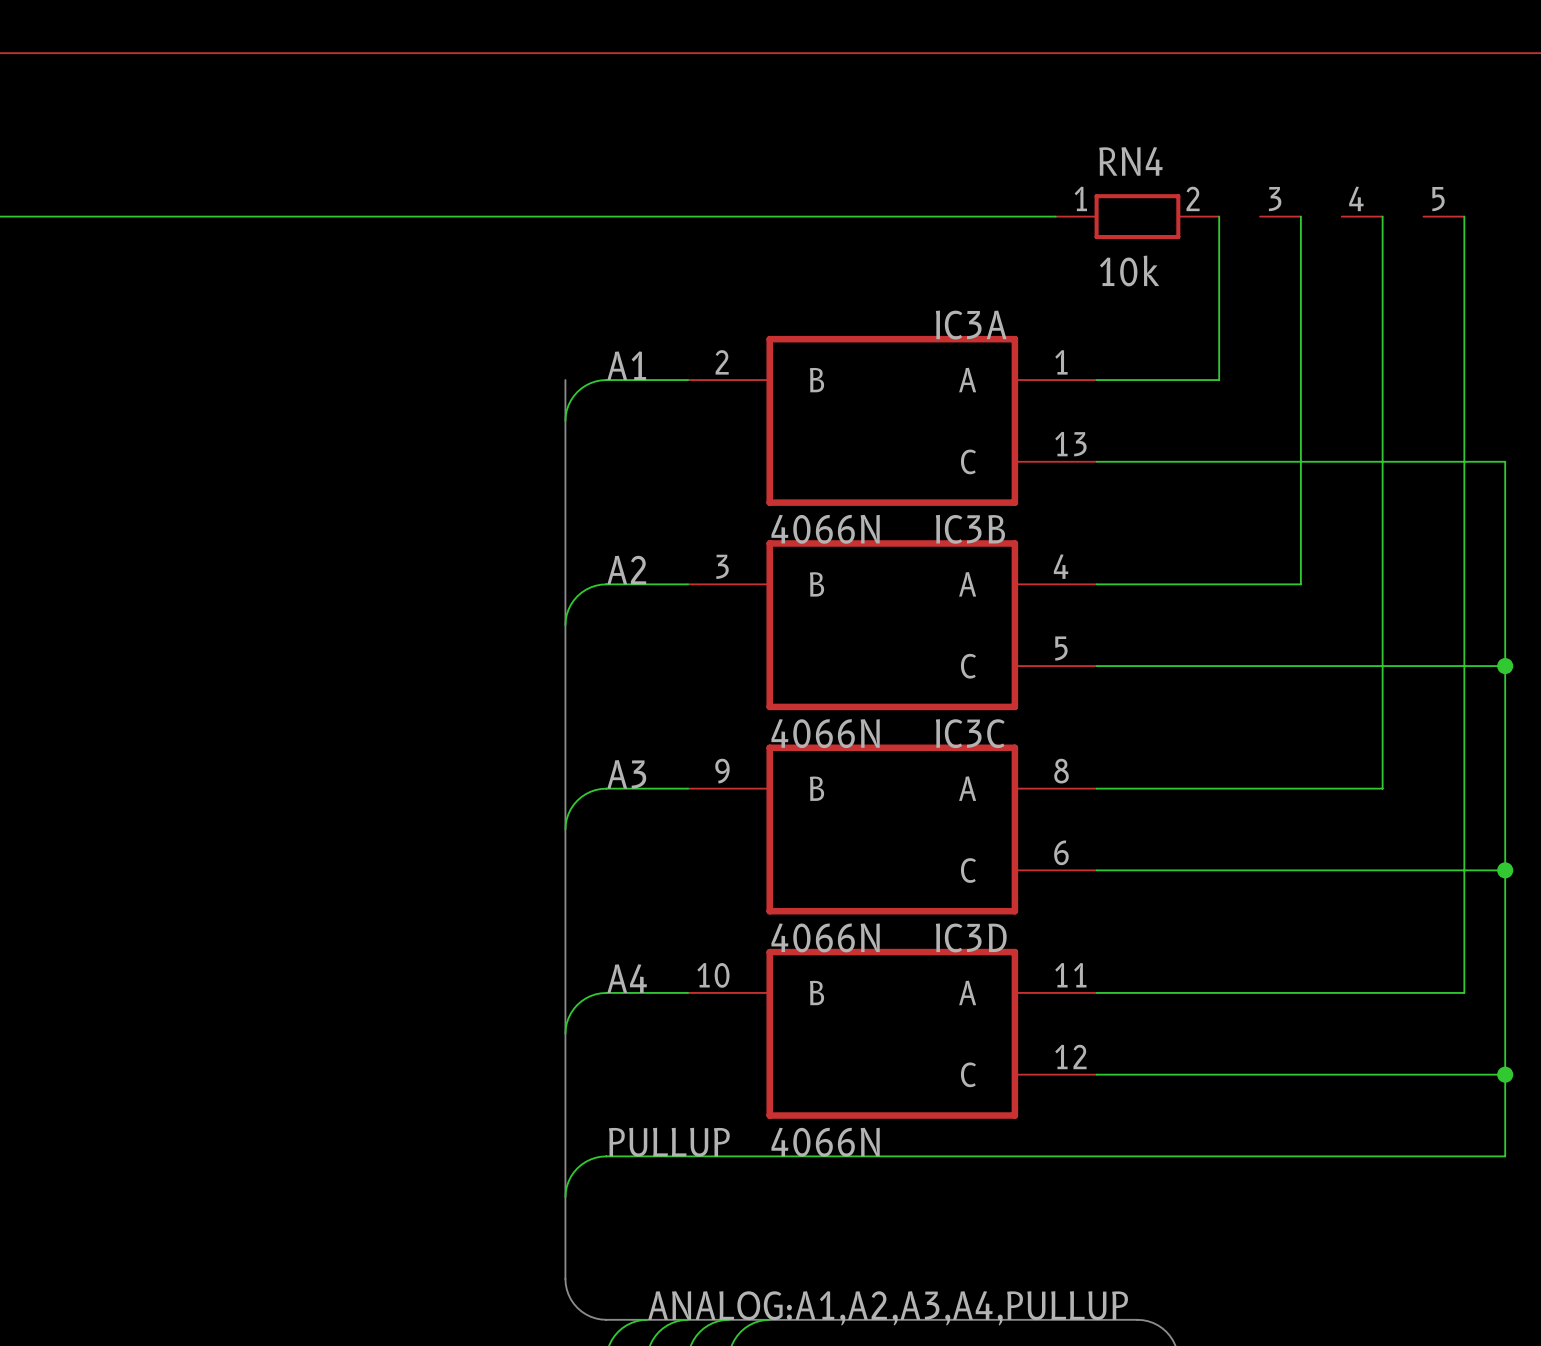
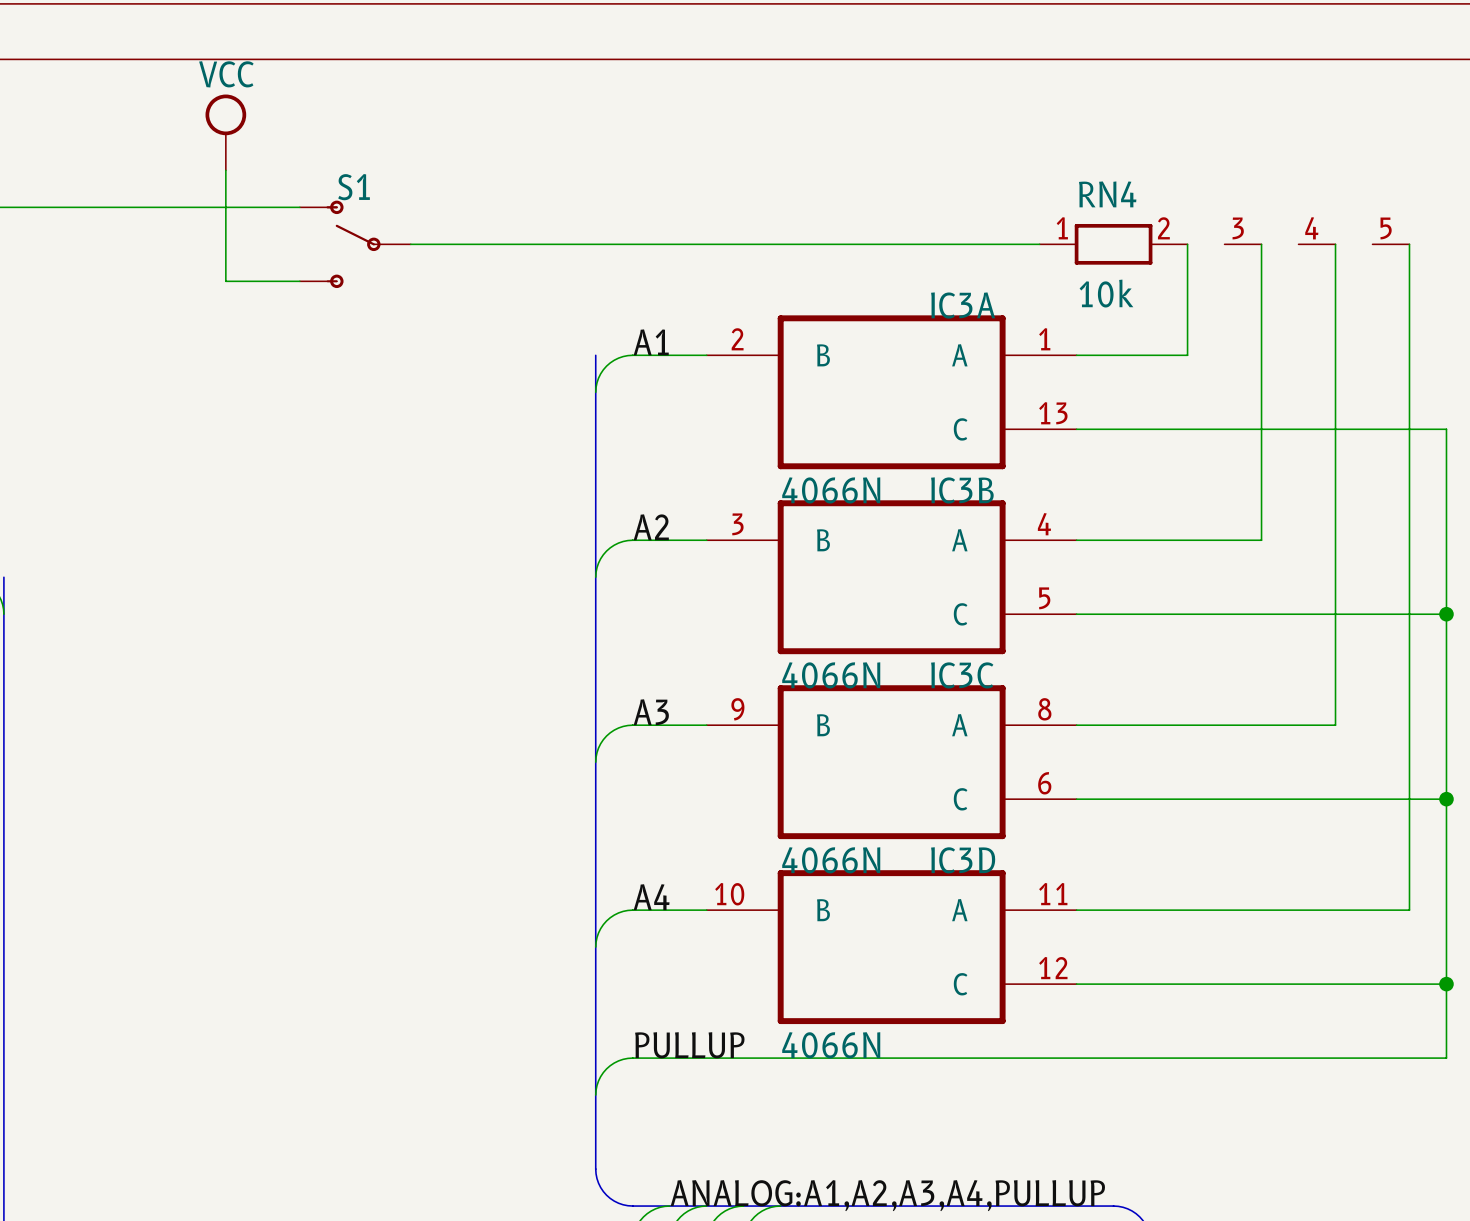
power symbol: none -> VCC (225, 132)
wire: none -> (225, 170) (225, 281) (299, 281)
wire: (238, 216) (1055, 216) -> none
wire: (1219, 216) (1219, 257) -> none
RN4 position: (1260, 216) -> (1224, 244)
wire: (1300, 216) (1300, 257) -> none
wire: (1382, 216) (1382, 257) -> none
wire: (1464, 216) (1464, 257) -> none
S1: none -> (355, 244)
wire: none -> (410, 244) (1039, 244)

